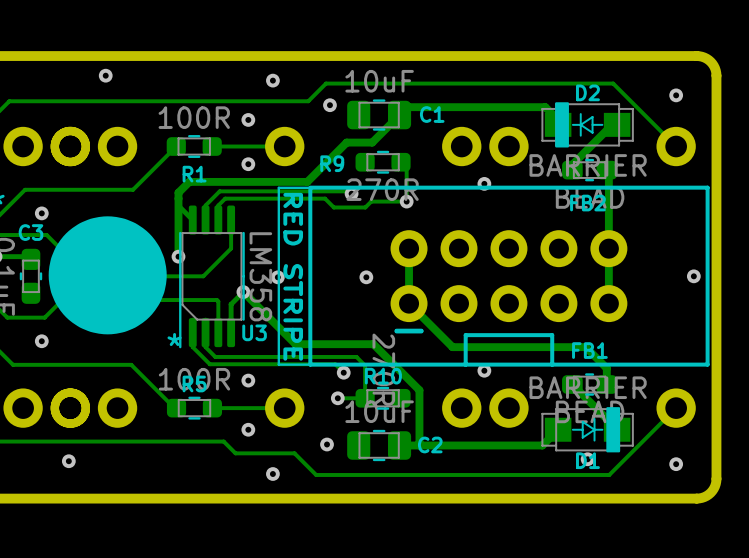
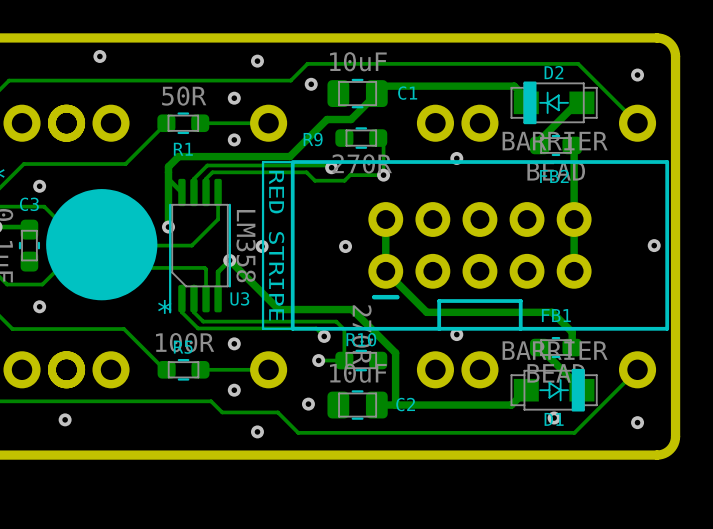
R1 value: 100R (194, 117) -> 50R (184, 96)

